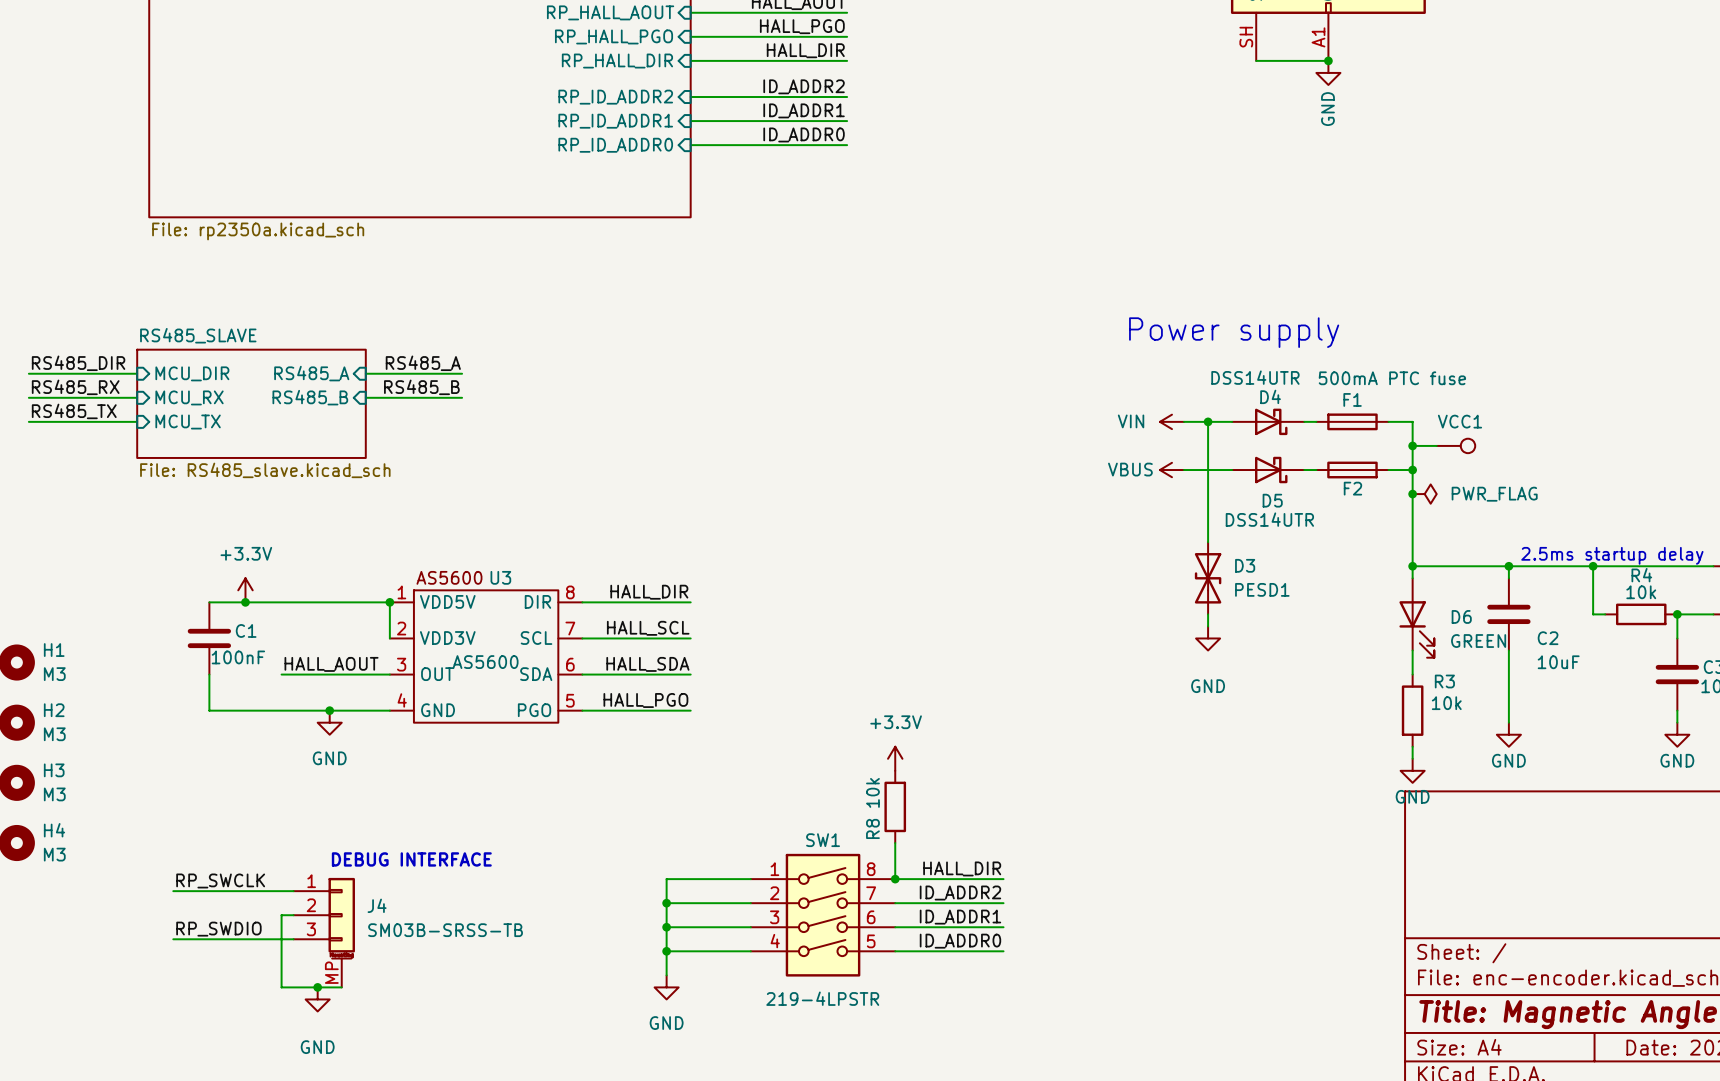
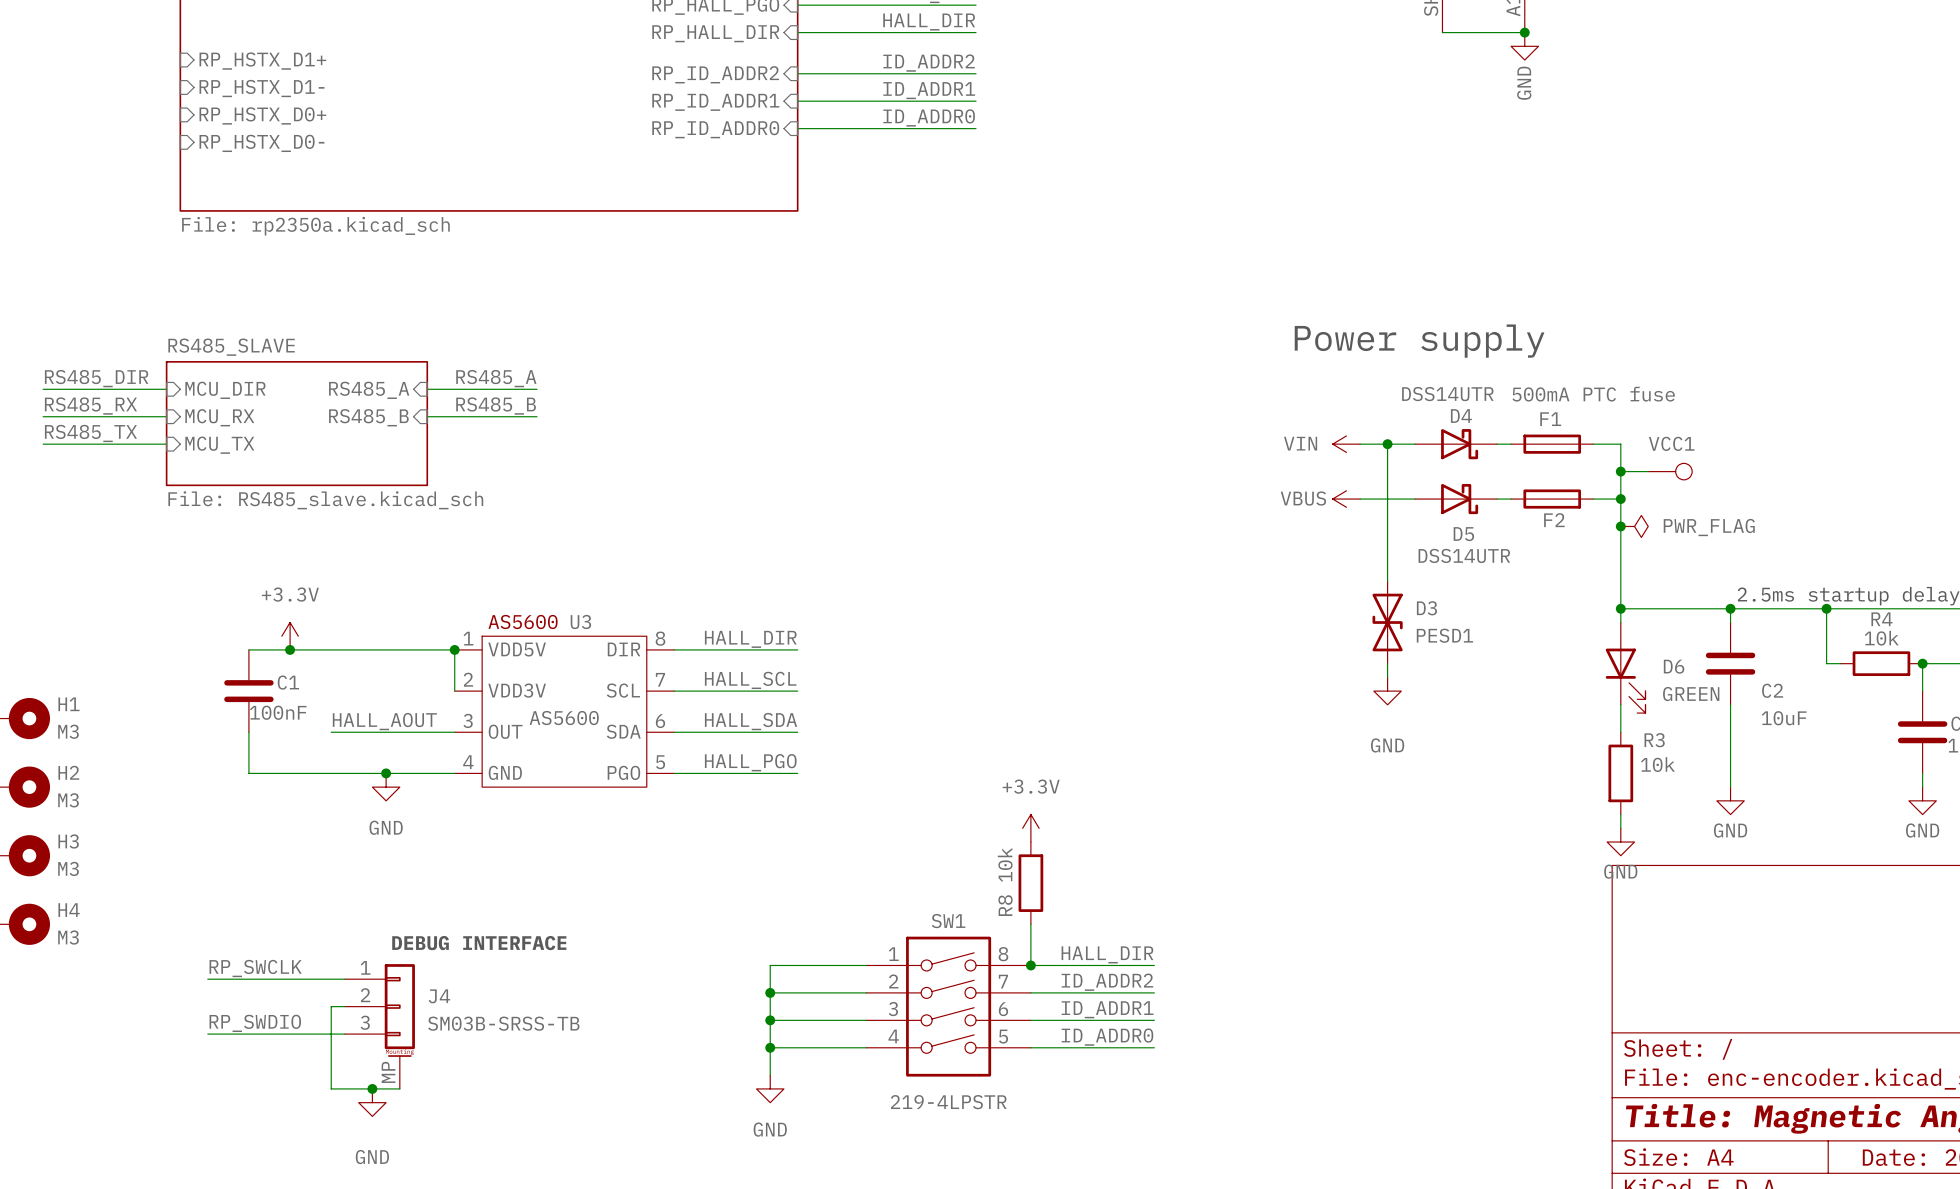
sheet pin: none -> RP_HSTX_D1+ (262, 61)
sheet pin: none -> RP_HSTX_D1- (261, 88)
sheet pin: none -> RP_HSTX_D0+ (262, 115)
sheet pin: none -> RP_HSTX_D0- (261, 143)

